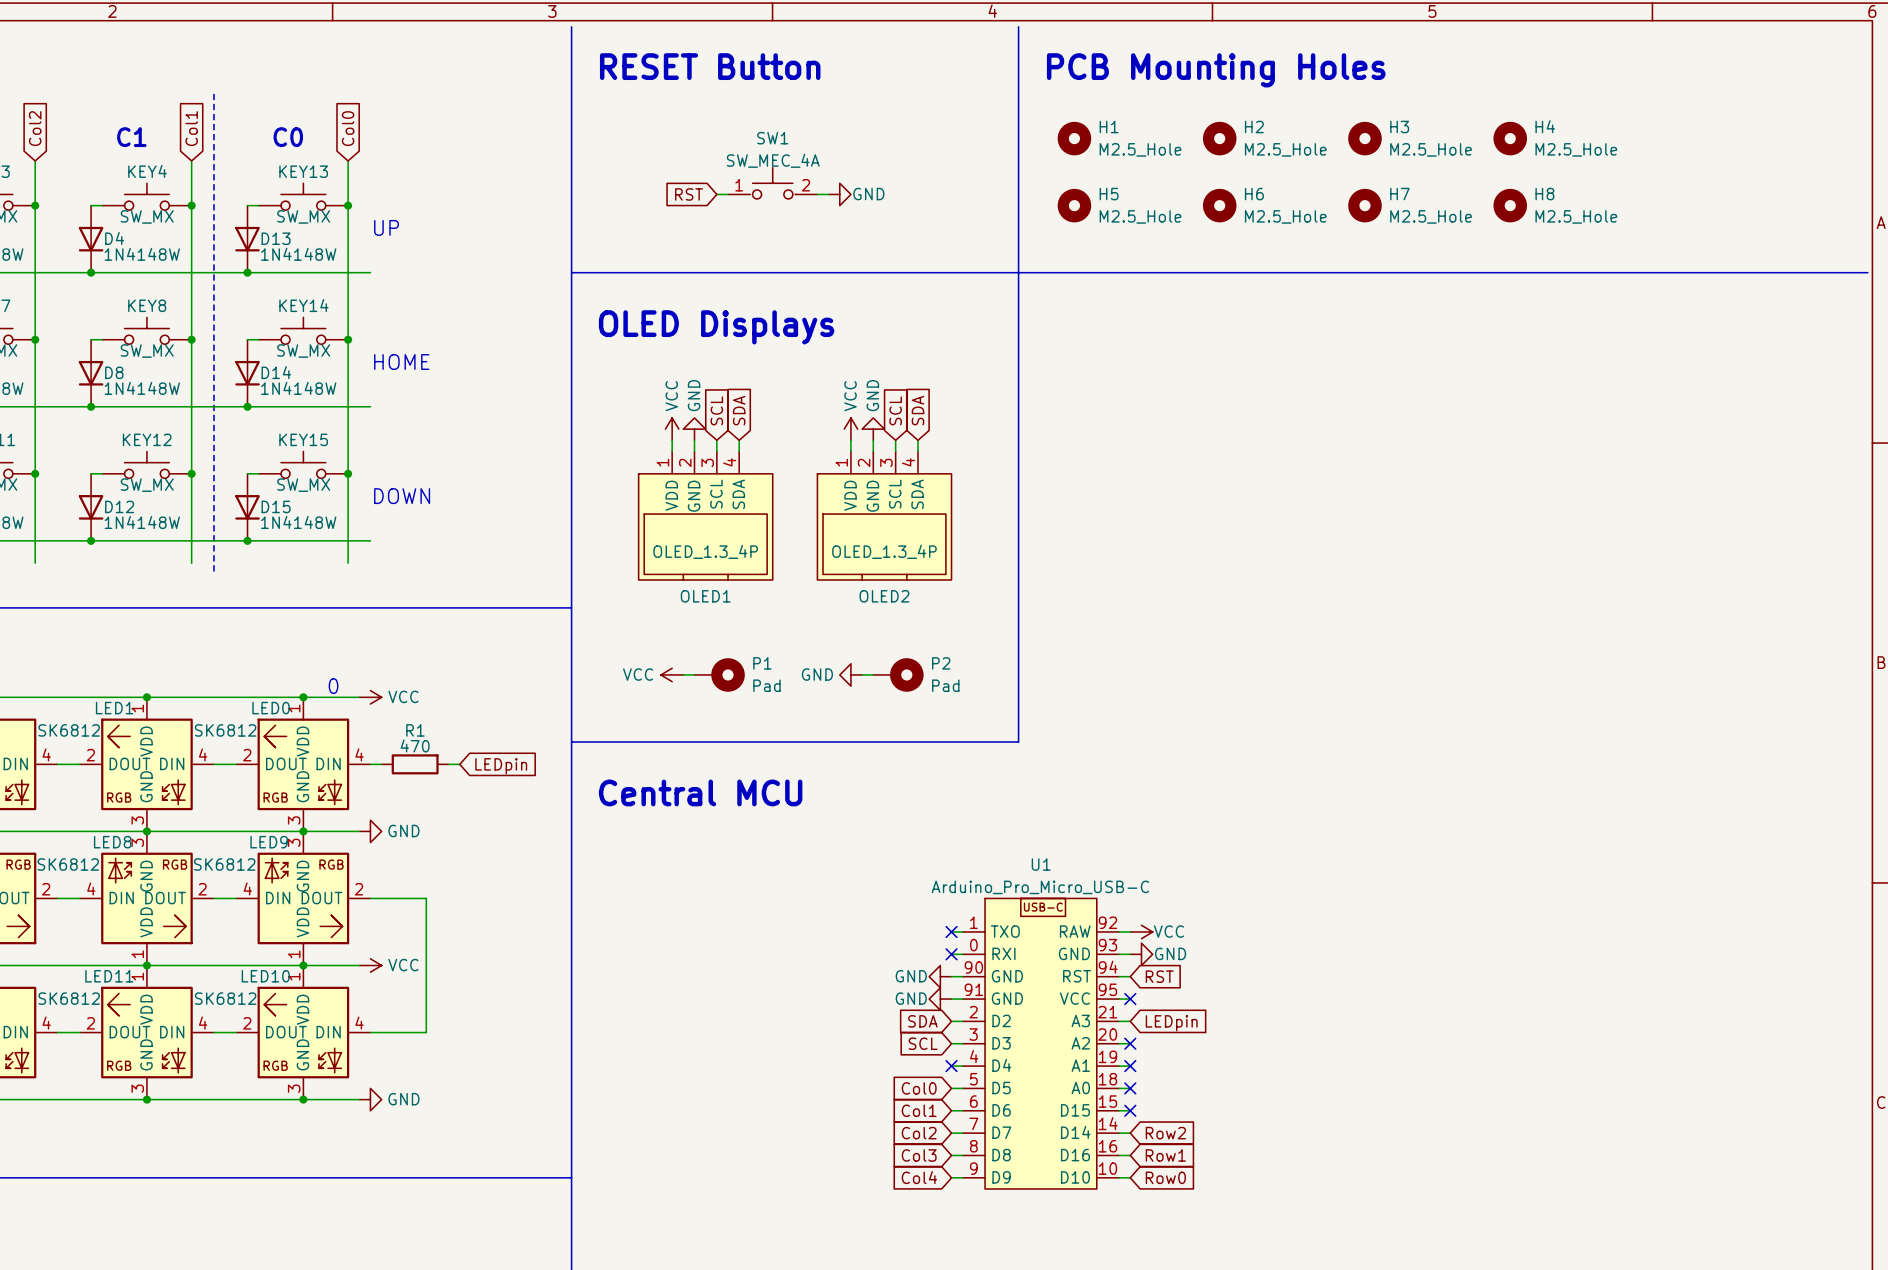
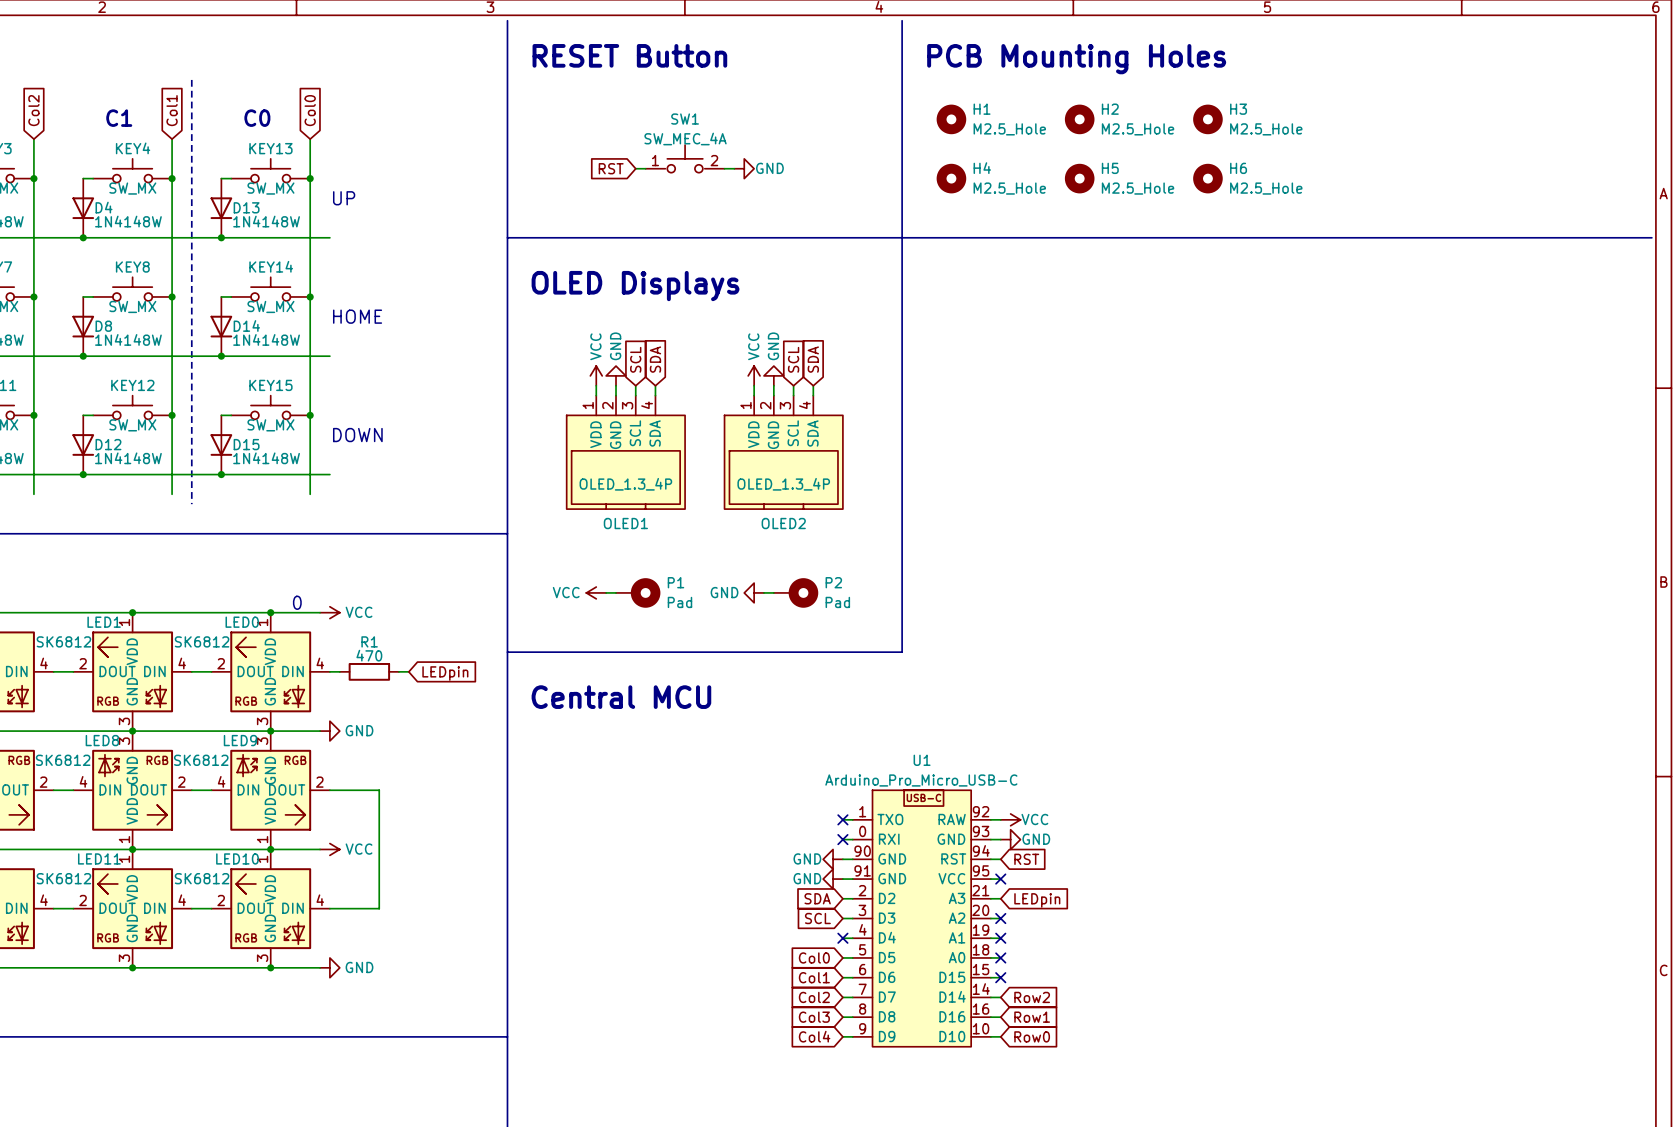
H4: M2.5_Hole (1510, 138) -> none
H5 name: H5 (1109, 194) -> H4 (982, 168)
H6 name: H6 (1254, 194) -> H5 (1110, 168)
H7 name: H7 (1399, 194) -> H6 (1238, 168)
H8: M2.5_Hole (1510, 205) -> none

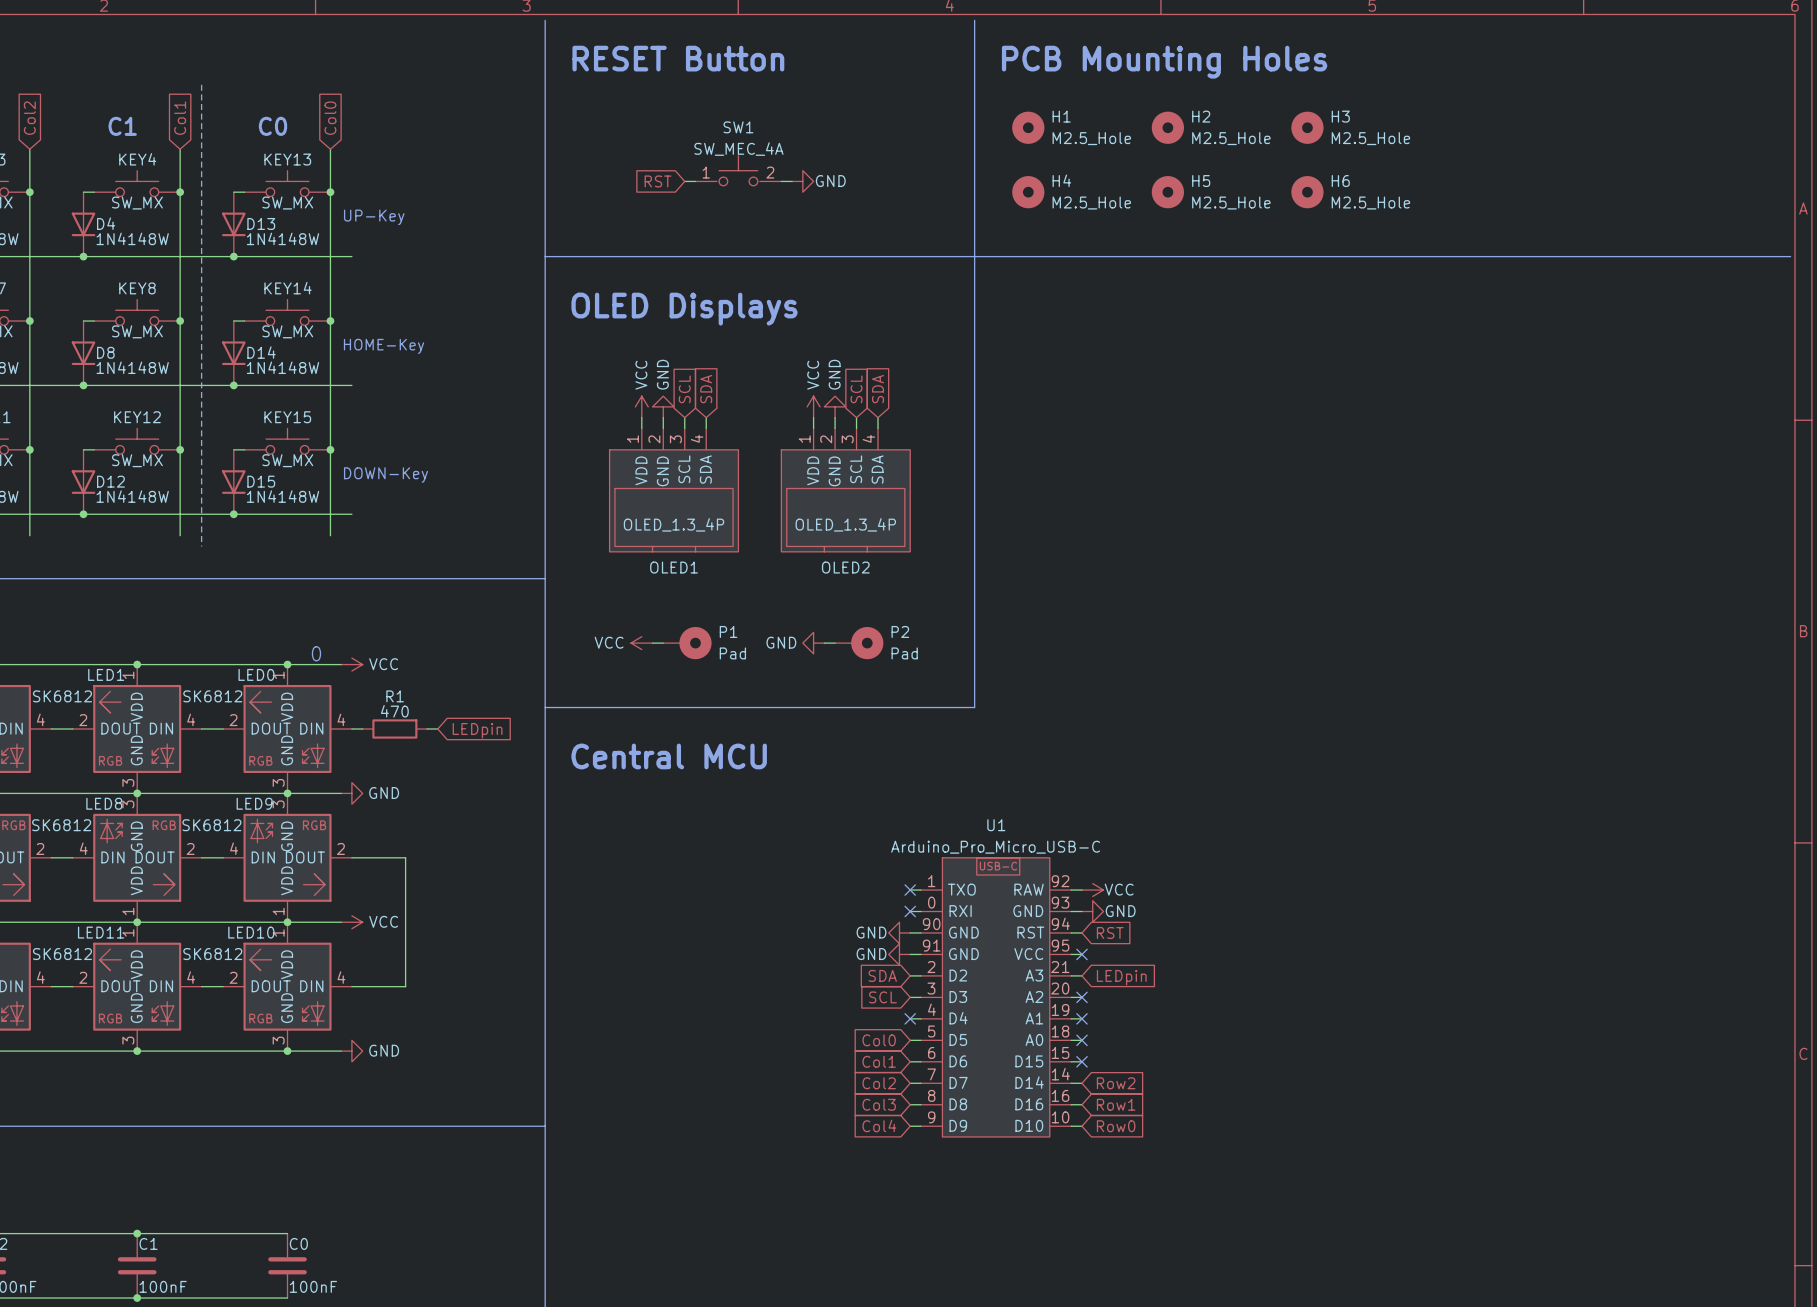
text: UP (344, 198) -> none
text: none -> UP-Key (374, 217)
text: HOME (357, 316) -> HOME-Key (384, 346)
text: DOWN (357, 435) -> DOWN-Key (386, 475)

